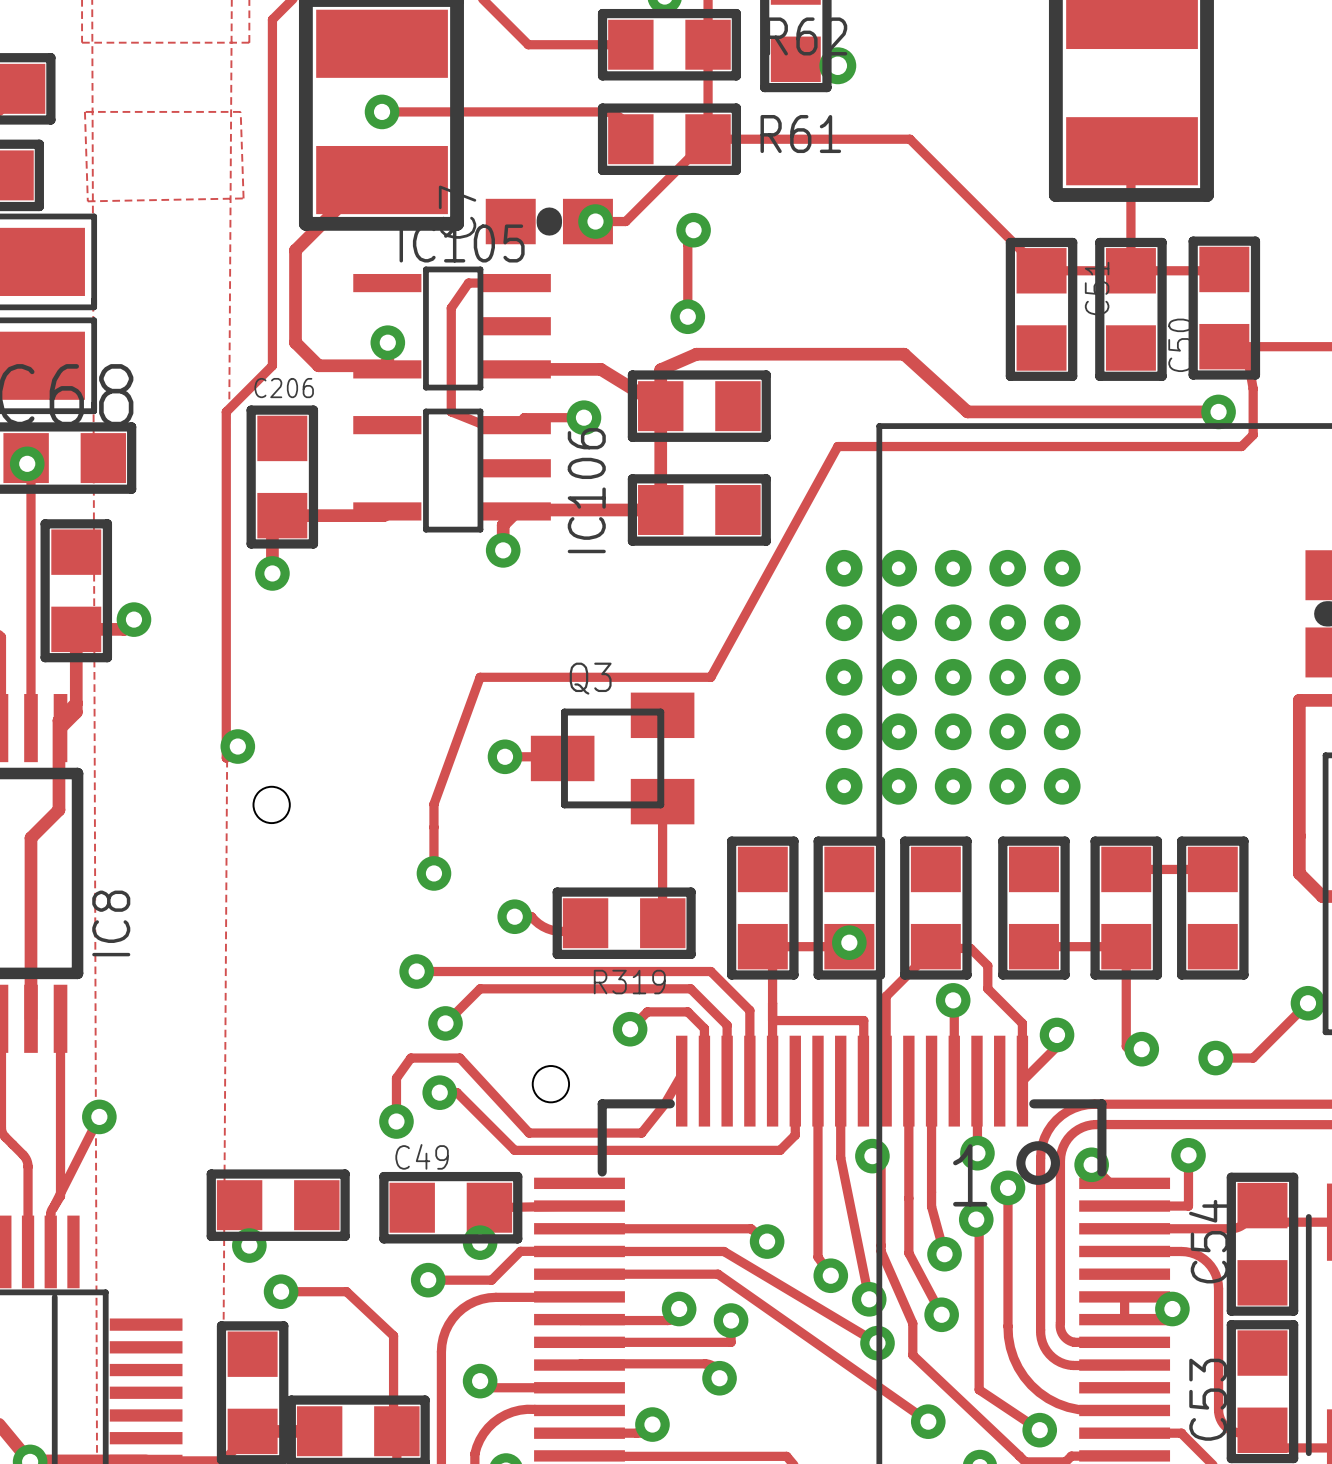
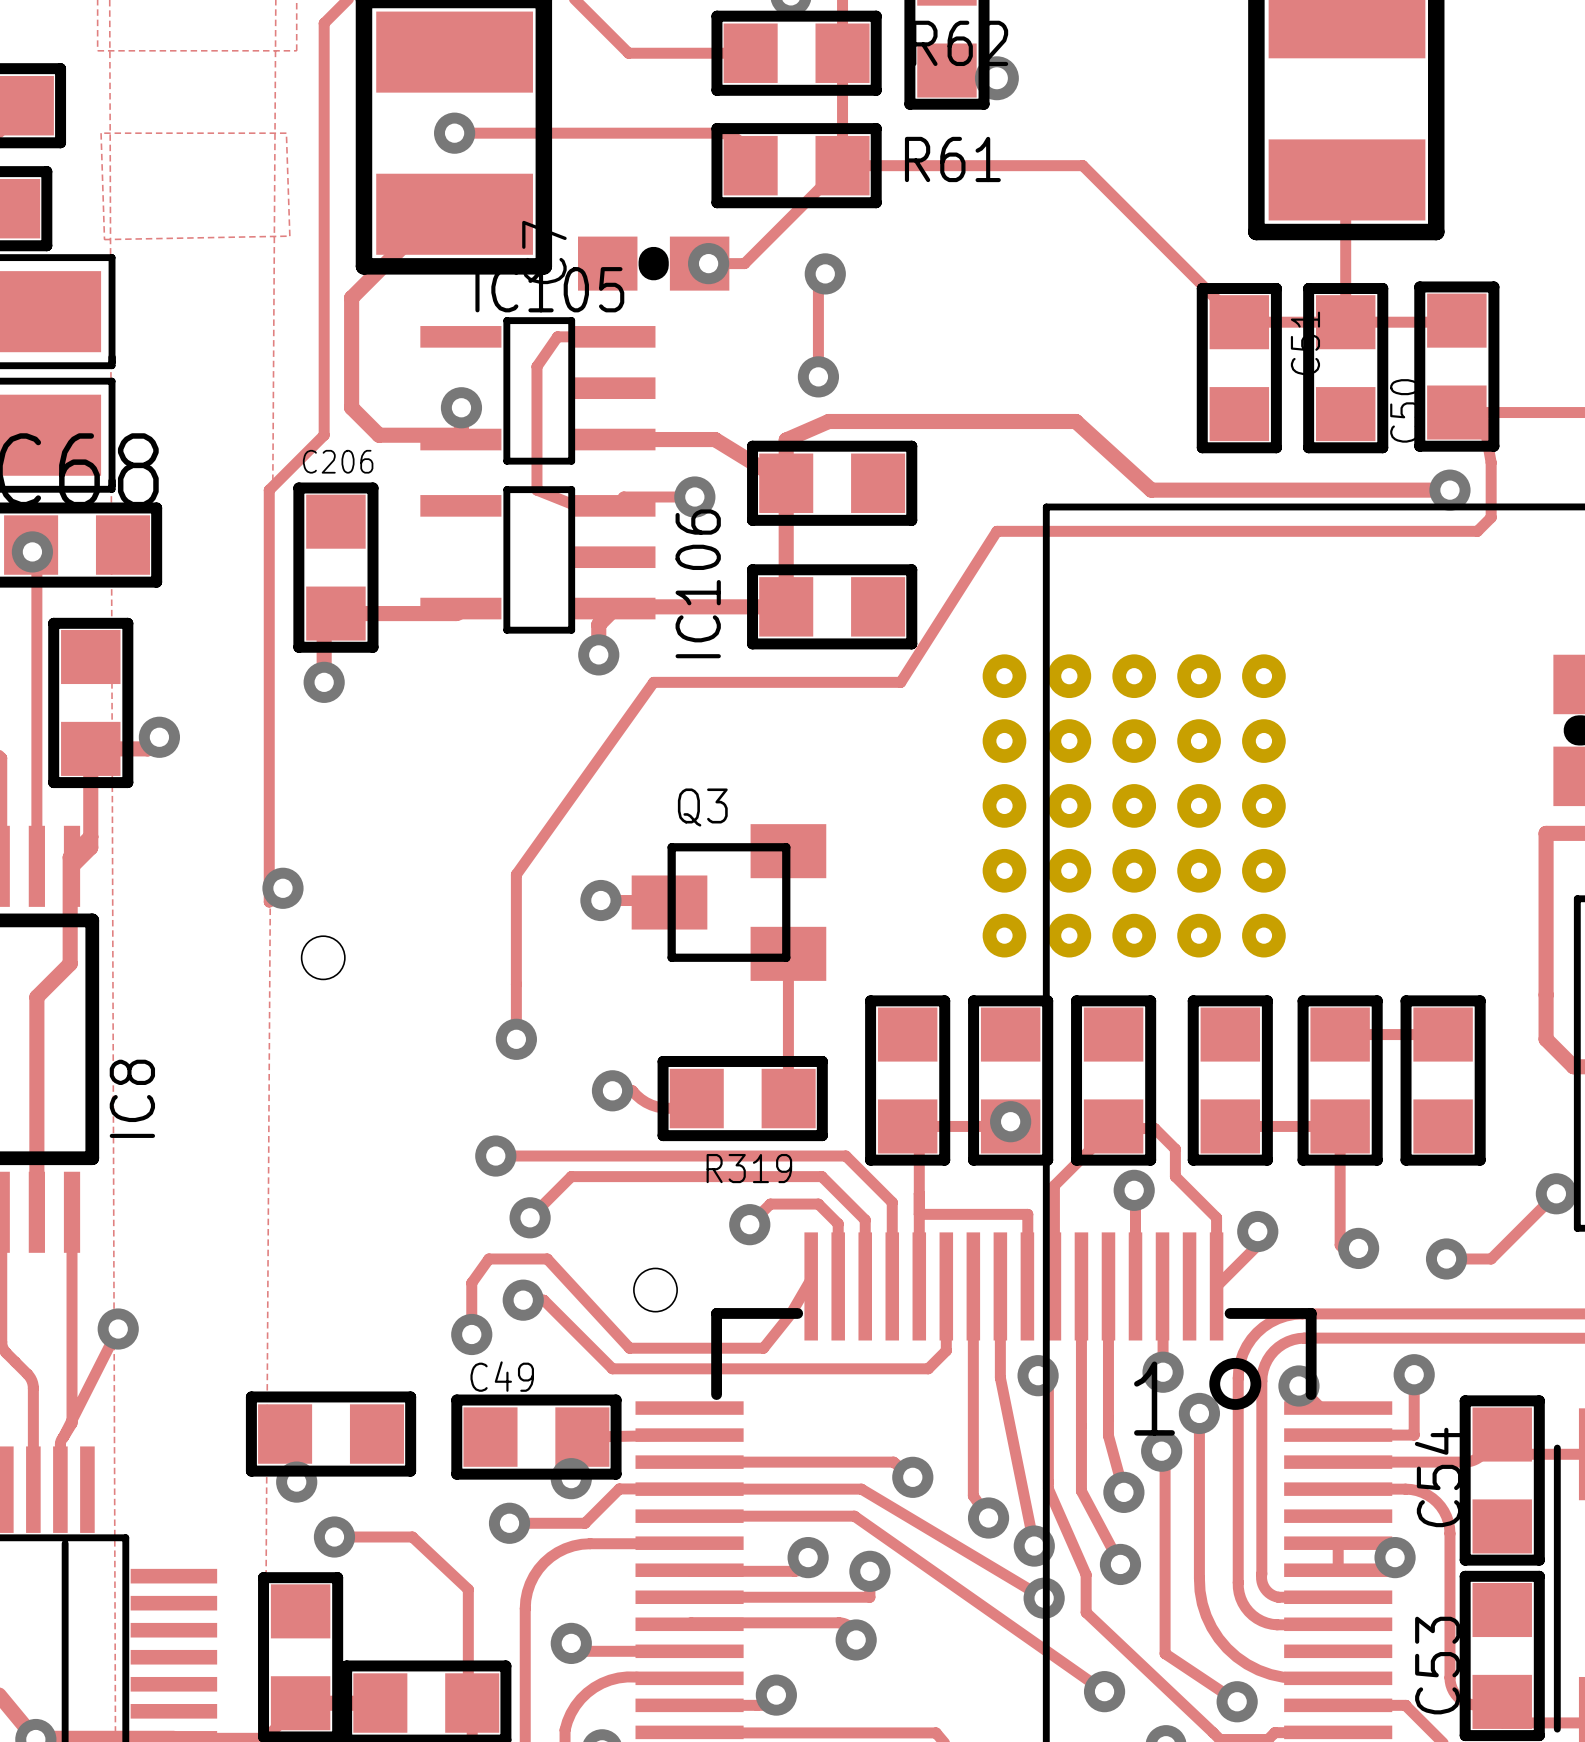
track: (837, 446) (710, 677) (480, 677) (433, 804) -> (996, 531) (900, 682) (653, 682) (516, 874) (516, 956)

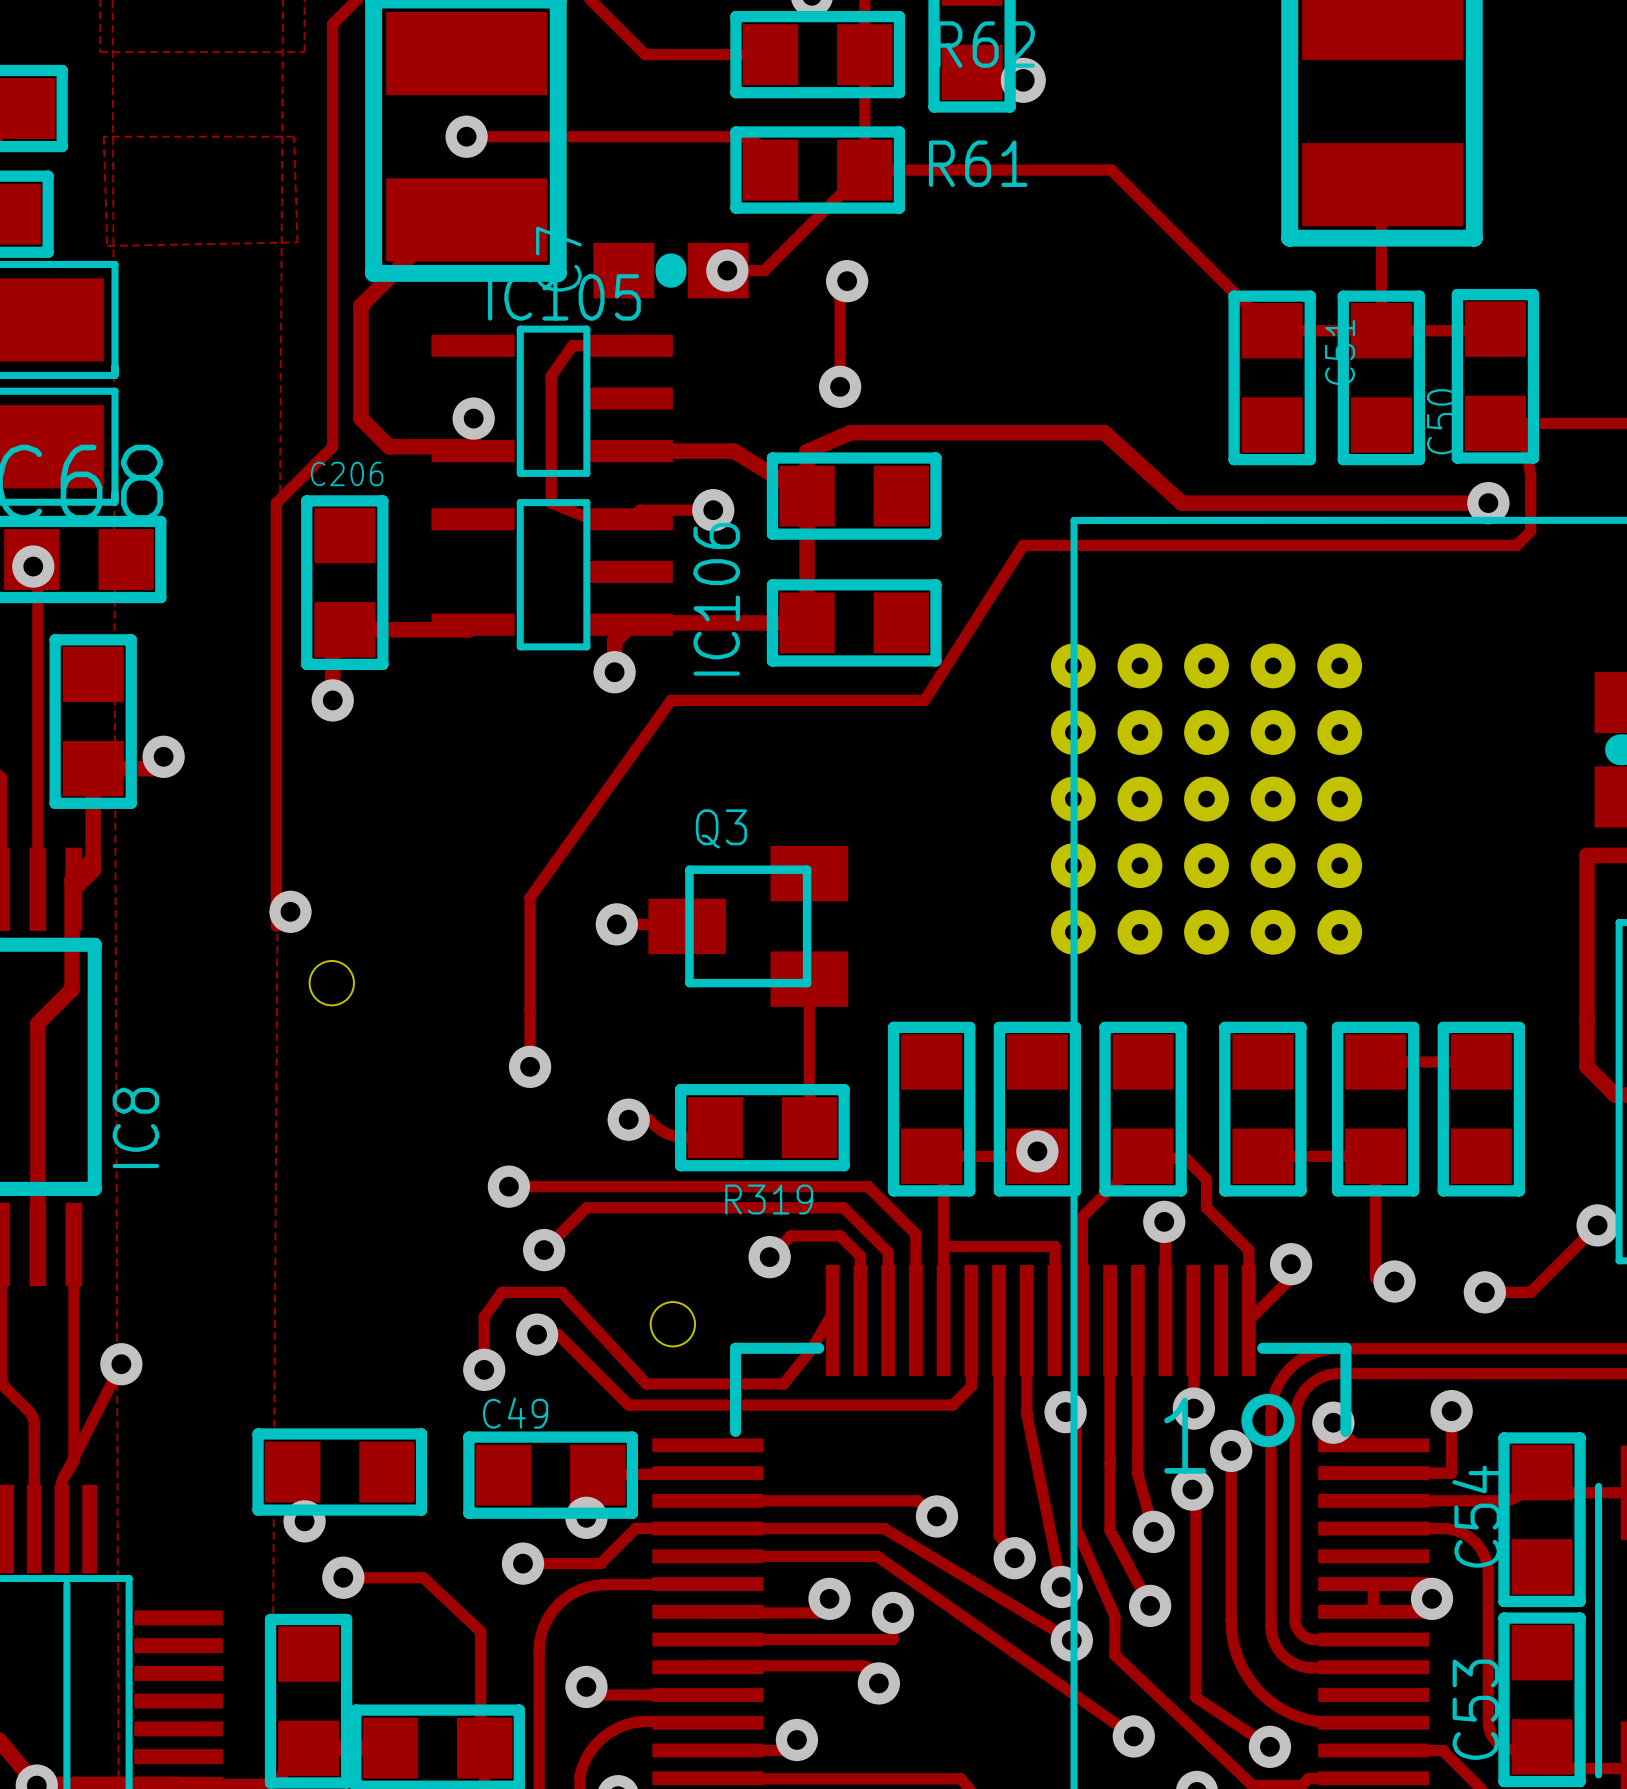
part position: (1134, 805) -> (1206, 799)

